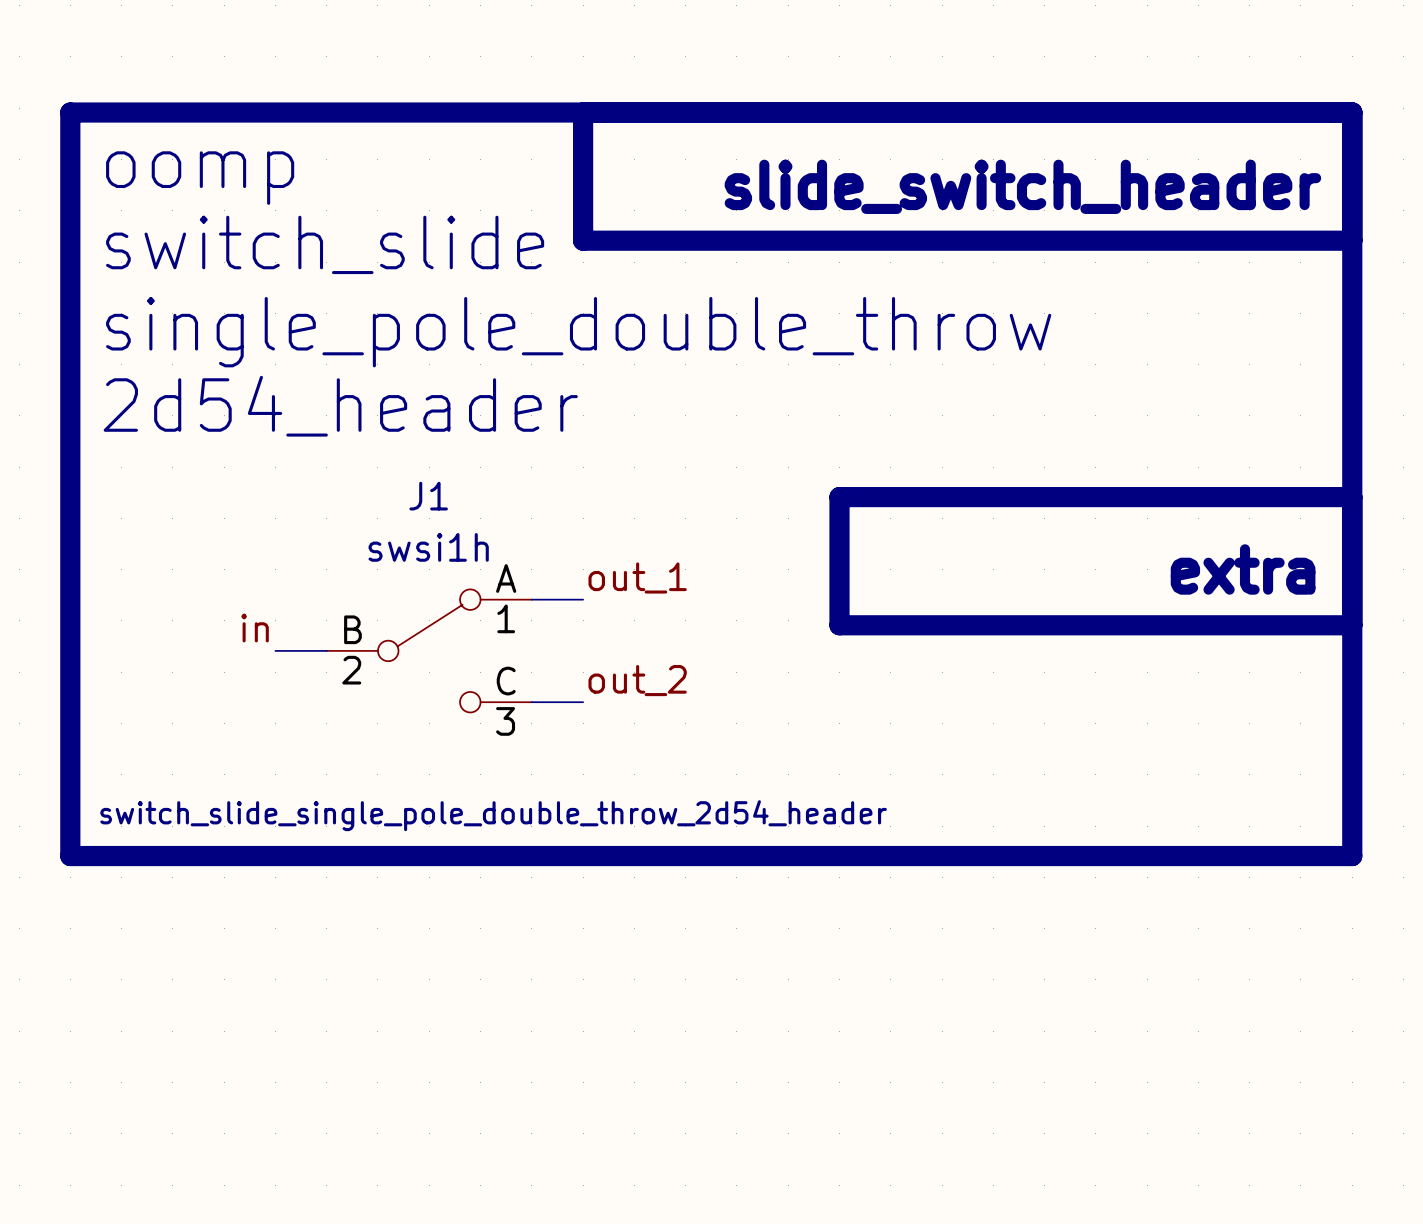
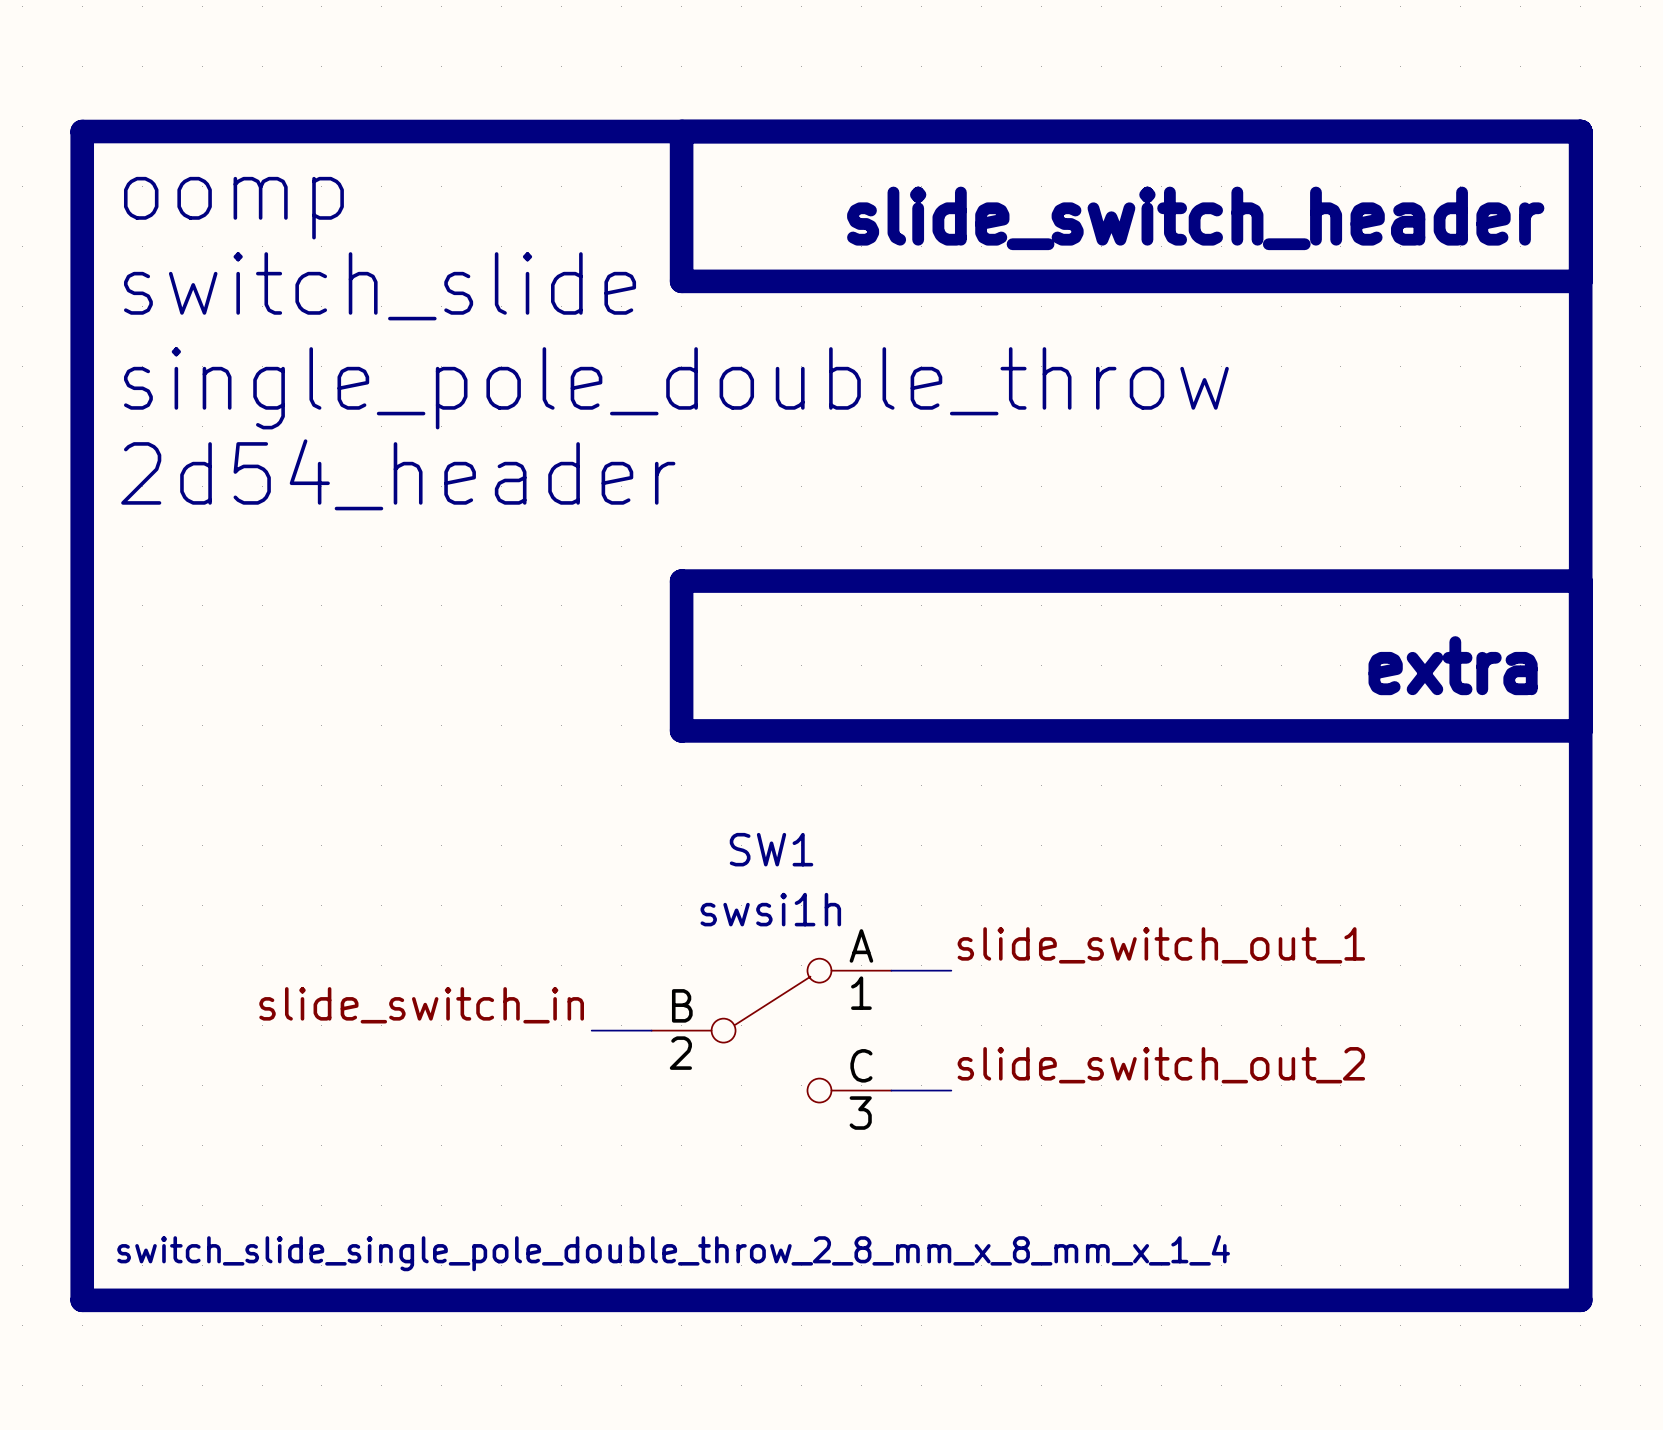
line: (839, 497) (839, 625) -> (981, 581) (681, 581) (681, 730) (981, 730)
label: out_1 (637, 577) -> none
wire: (531, 599) (583, 599) -> (891, 970) (951, 970)
label: in (255, 628) -> none
wire: (275, 650) (326, 650) -> (591, 1030) (651, 1030)
J1: swsi1h (429, 650) -> none
label: out_2 (637, 680) -> none
wire: (531, 702) (583, 702) -> (891, 1090) (951, 1090)
label: none -> slide_switch_out_1 (1161, 945)
text: switch_slide_single_pole_double_throw_2d54_header (493, 815) -> none
line: (70, 856) (1352, 856) -> (82, 1000) (82, 1300) (1580, 1300) (1580, 1000)
label: none -> slide_switch_in (421, 1005)
SW1: none -> swsi1h (771, 1030)
label: none -> slide_switch_out_2 (1161, 1065)
text: none -> switch_slide_single_pole_double_throw_2_8_mm_x_8_mm_x_1_4 (673, 1253)

